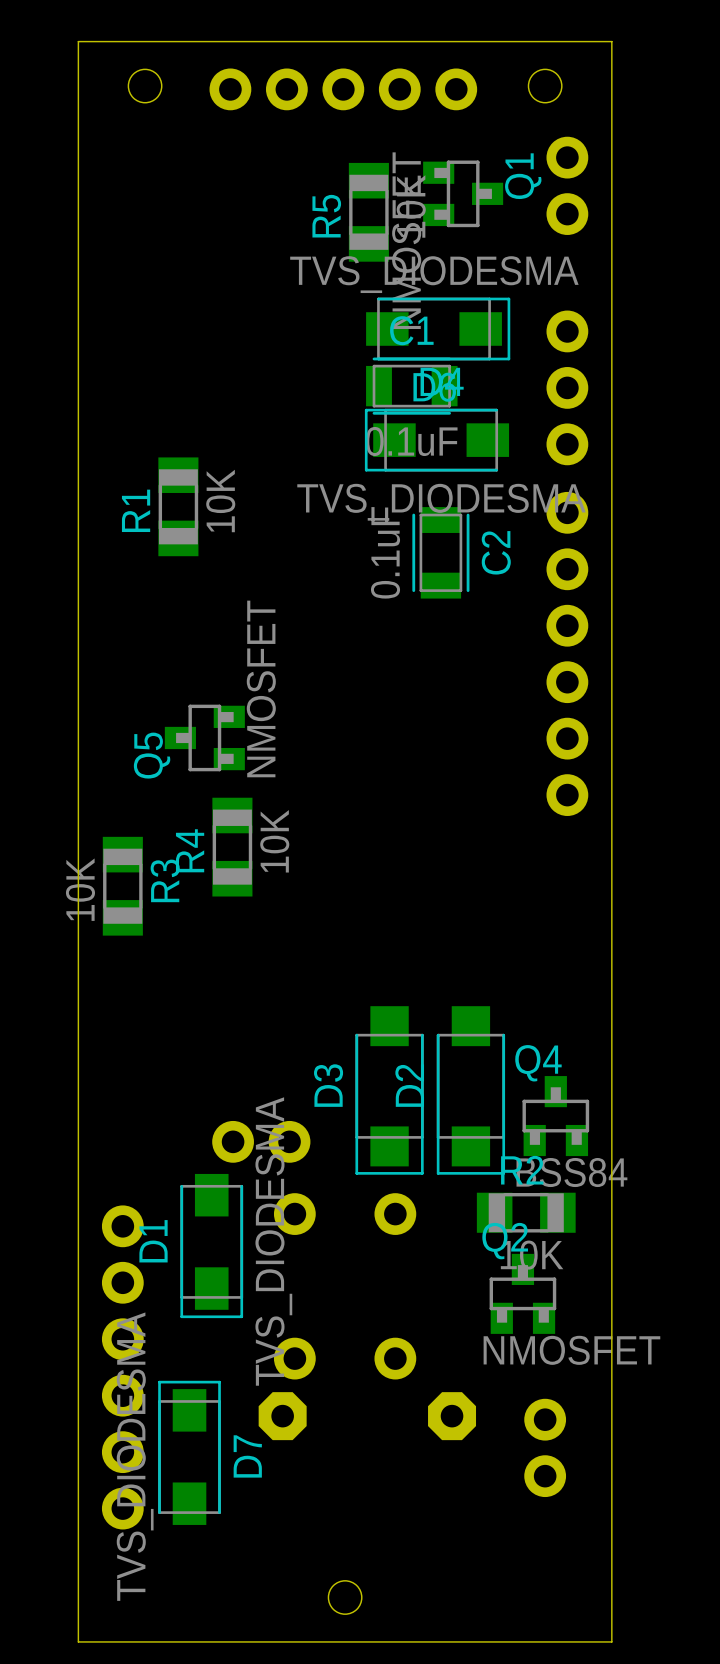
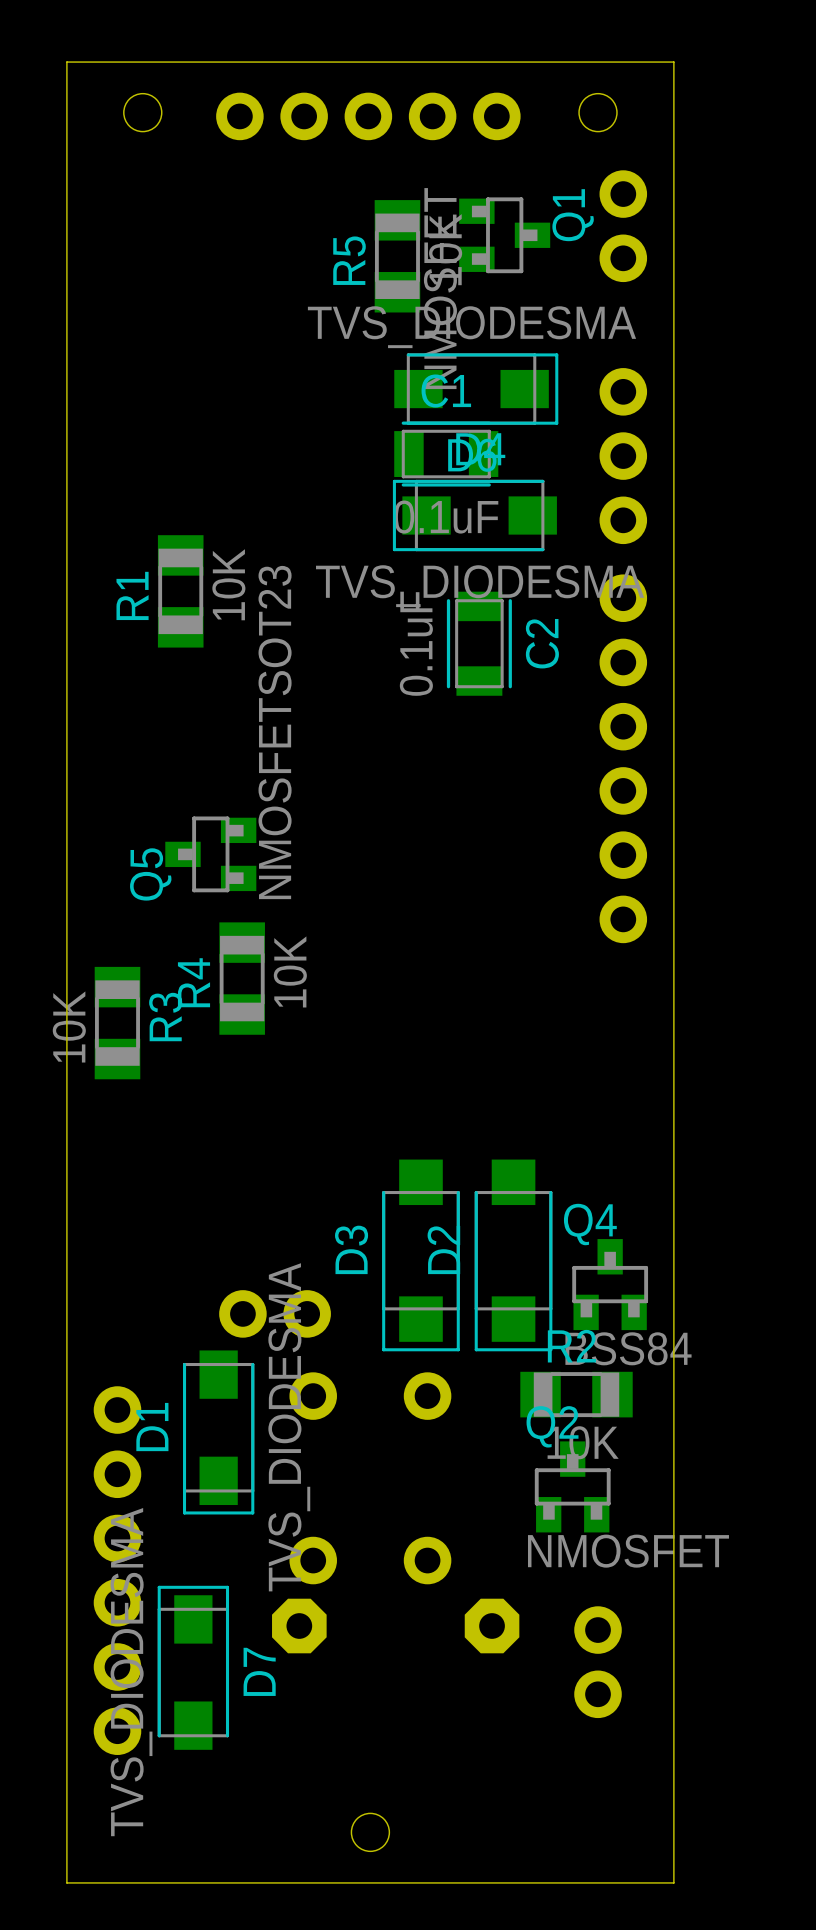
Q5 value: NMOSFET (261, 688) -> NMOSFETSOT23 (275, 732)

